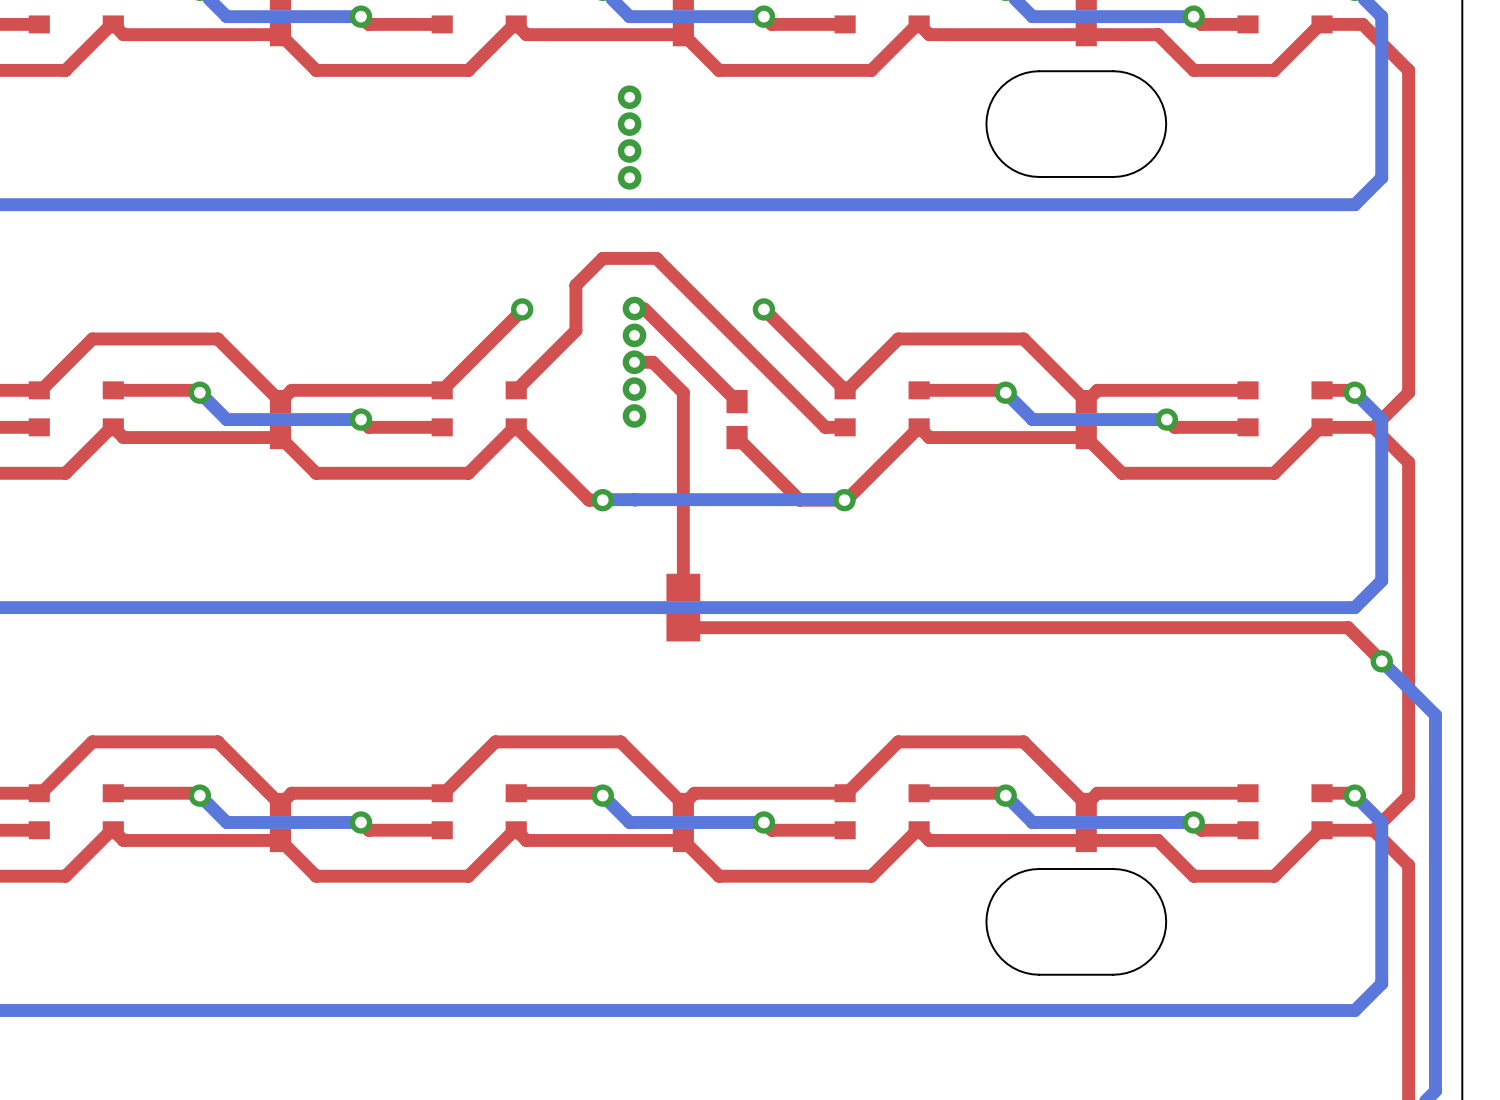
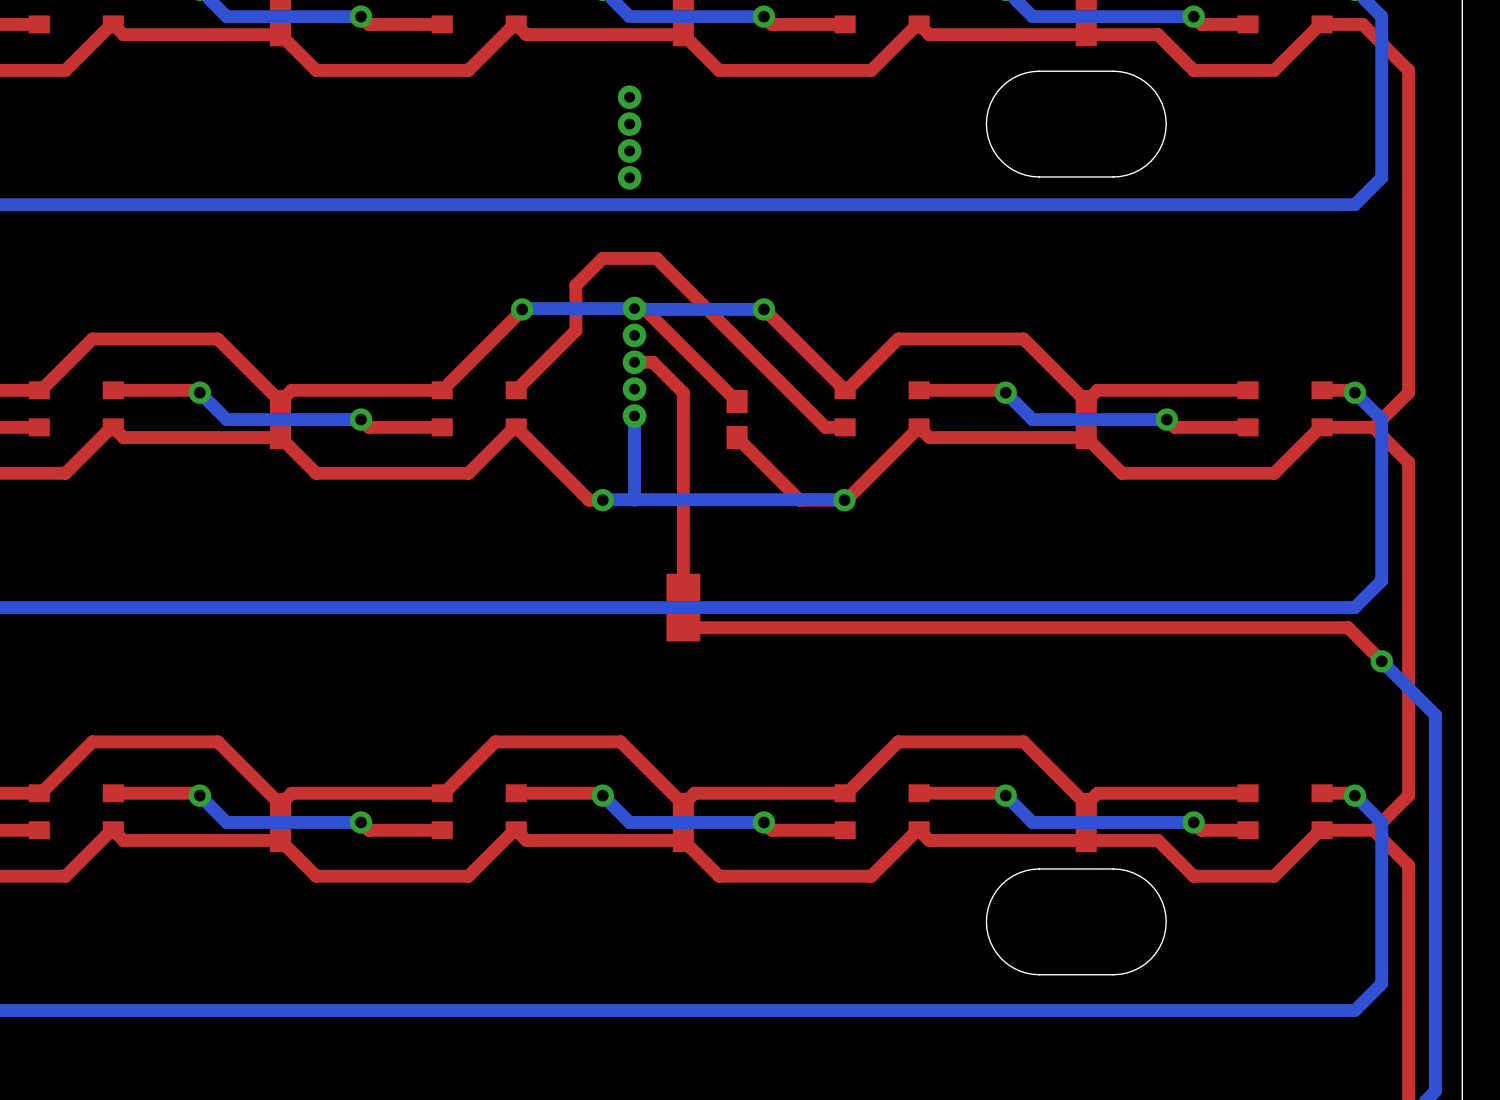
bottom track: none -> (523, 308) (763, 309)
bottom track: none -> (634, 415) (634, 499)

